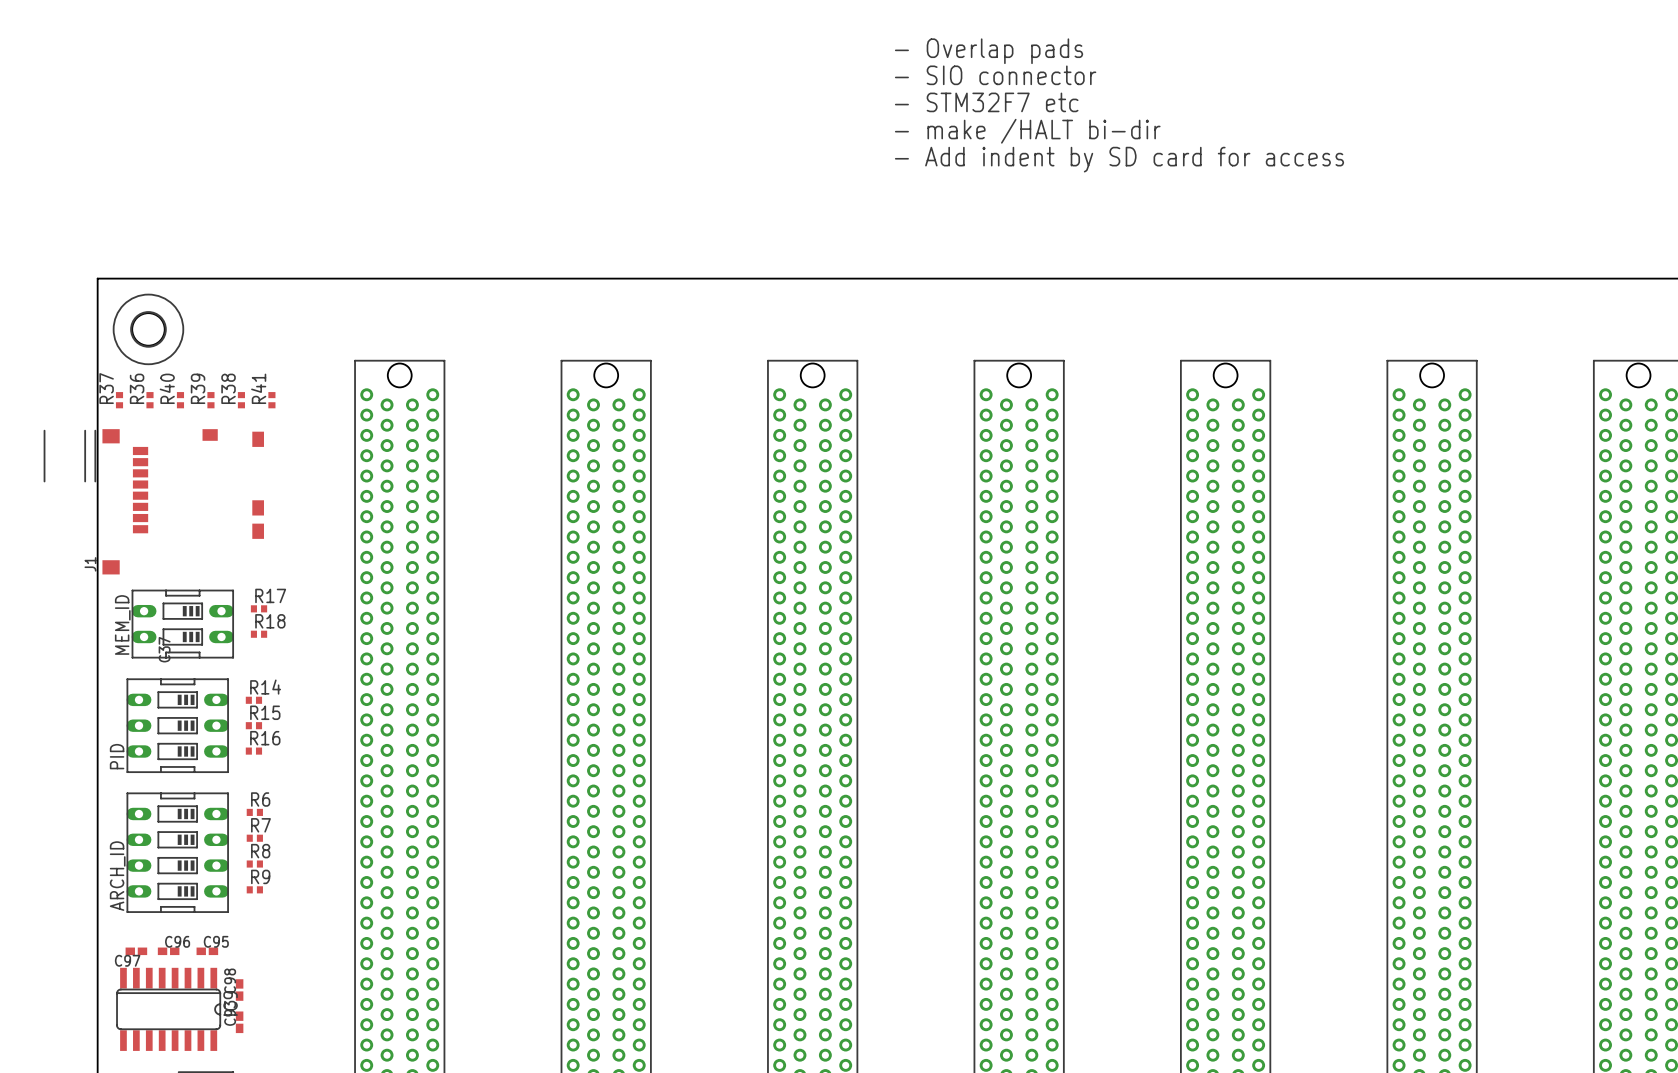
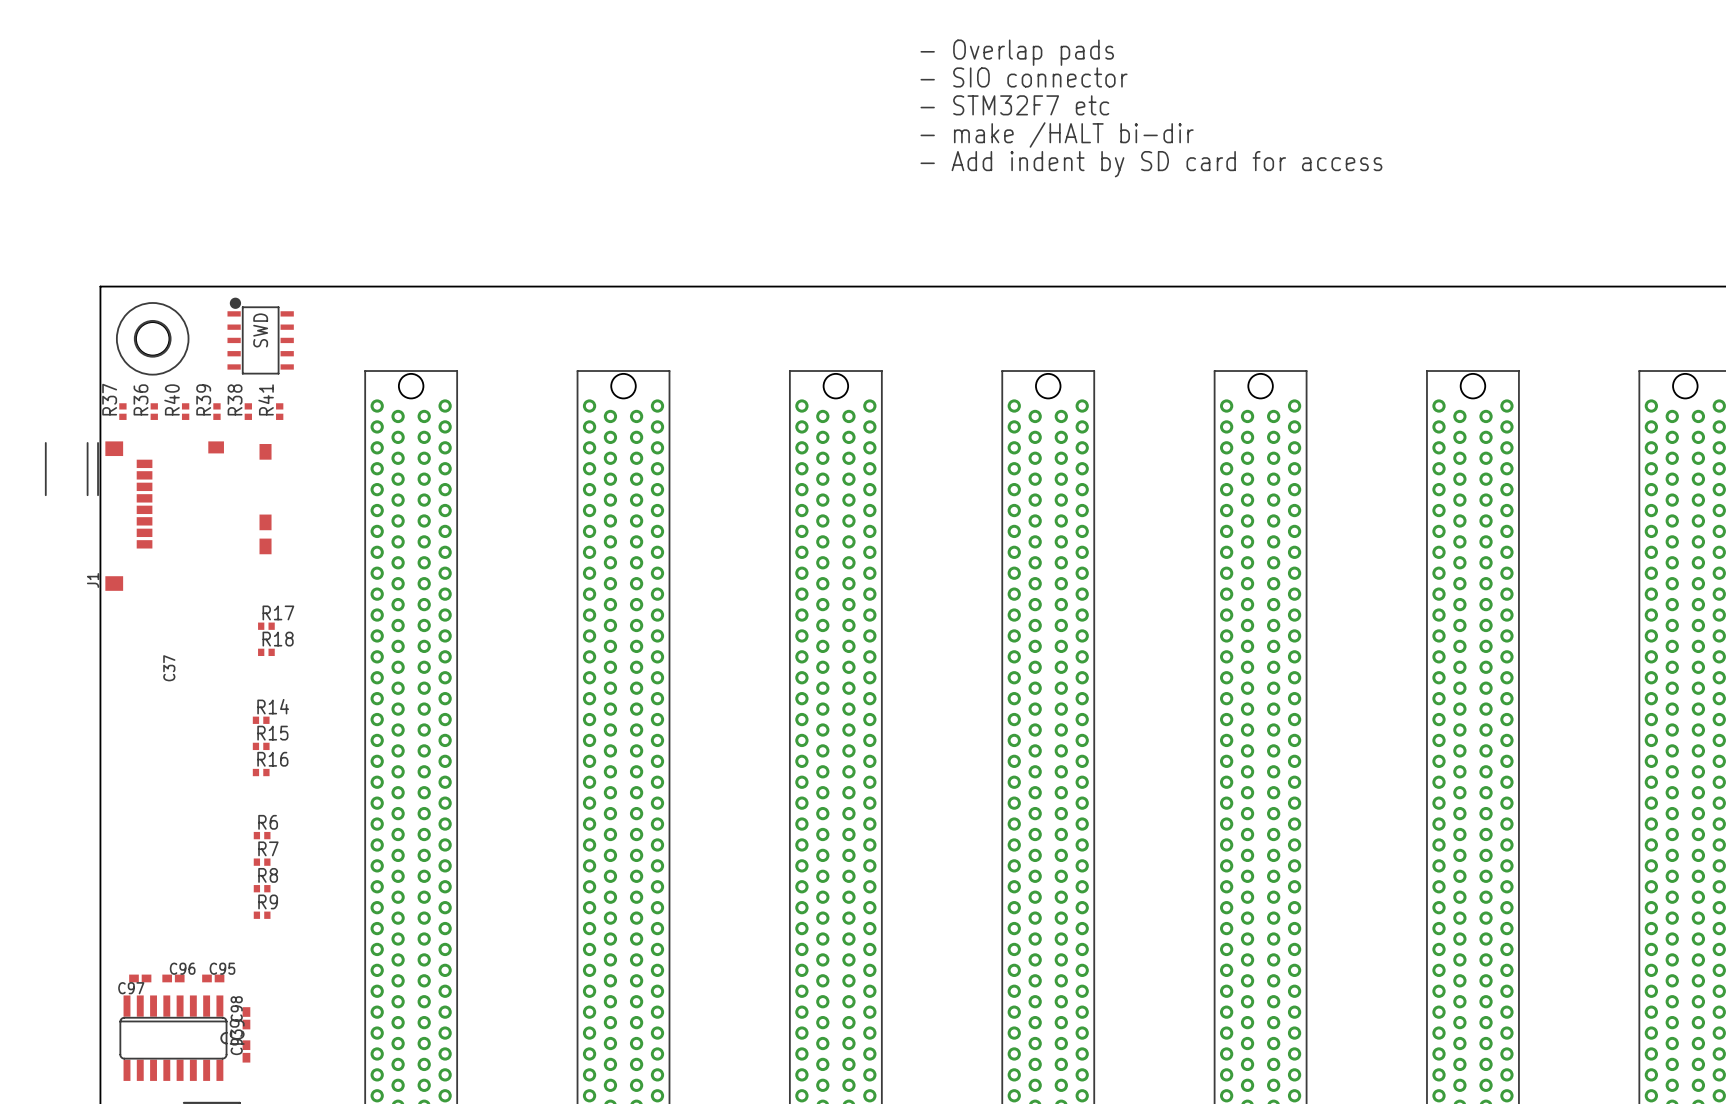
SWD: none -> (260, 335)
MEM_ID: (182, 624) -> none
PID: (177, 725) -> none
ARCH_ID: (177, 852) -> none

